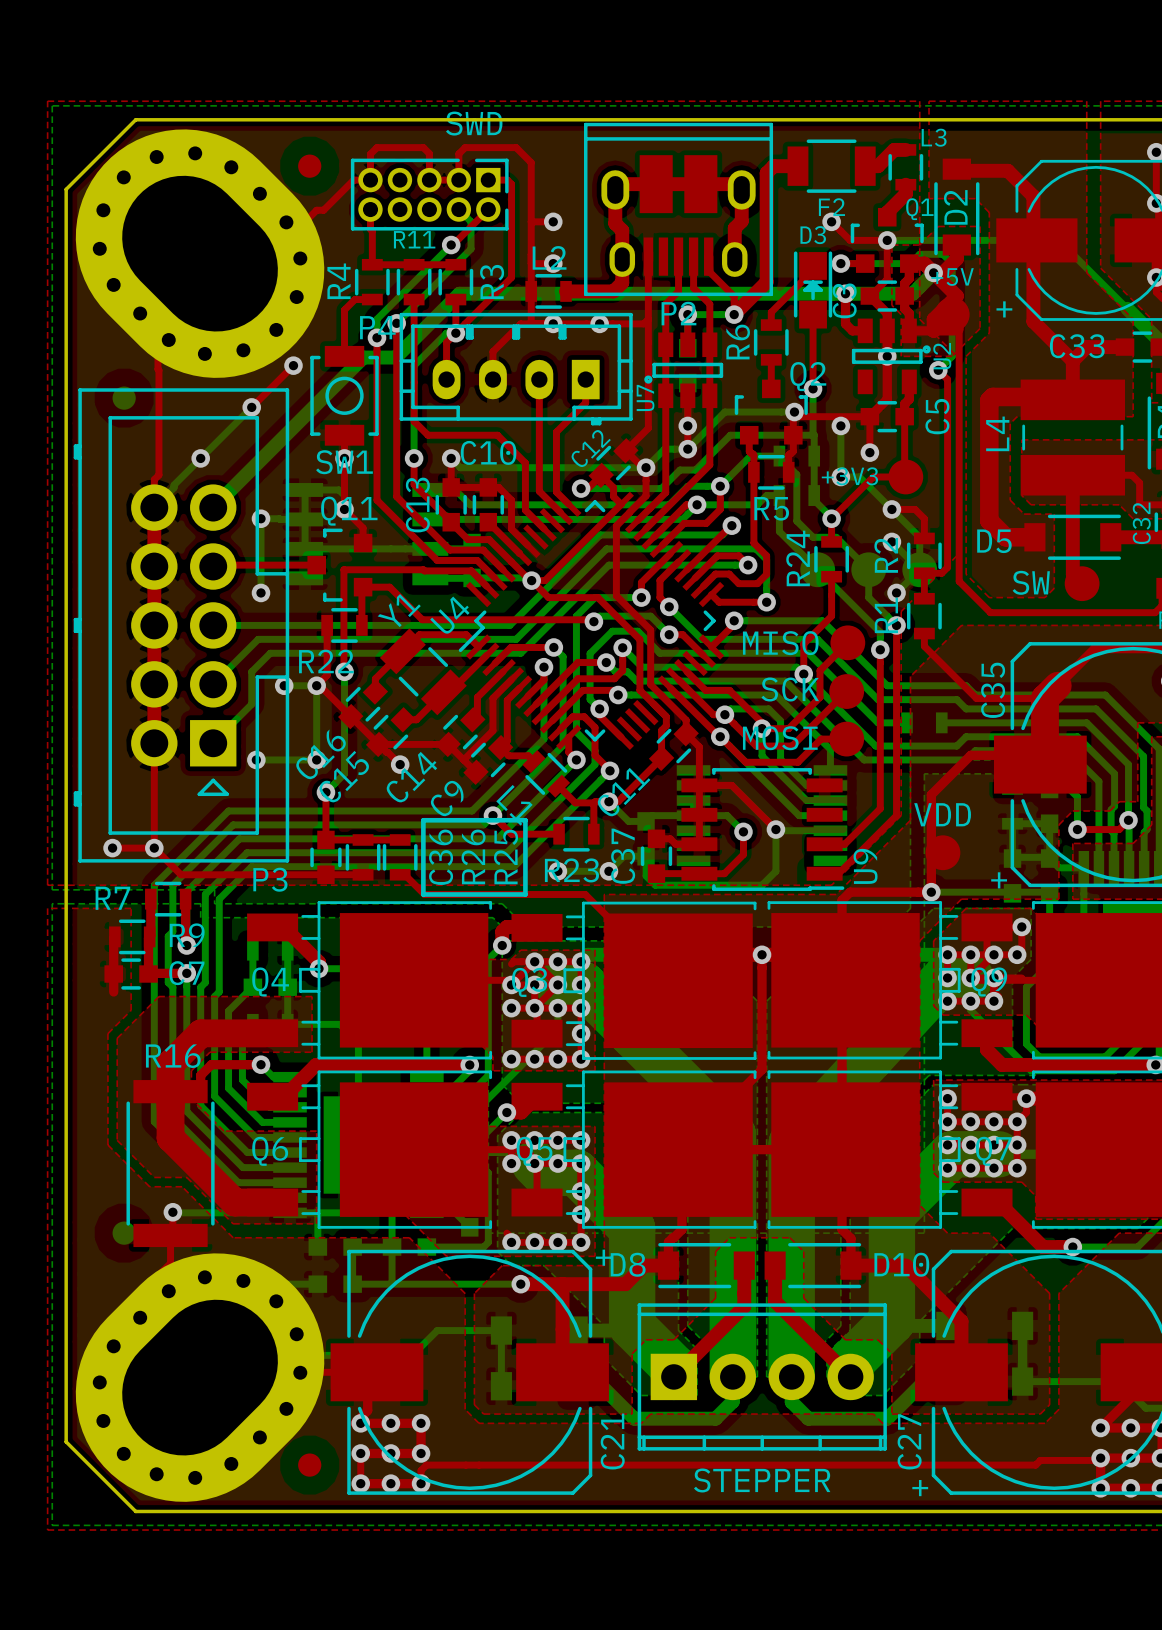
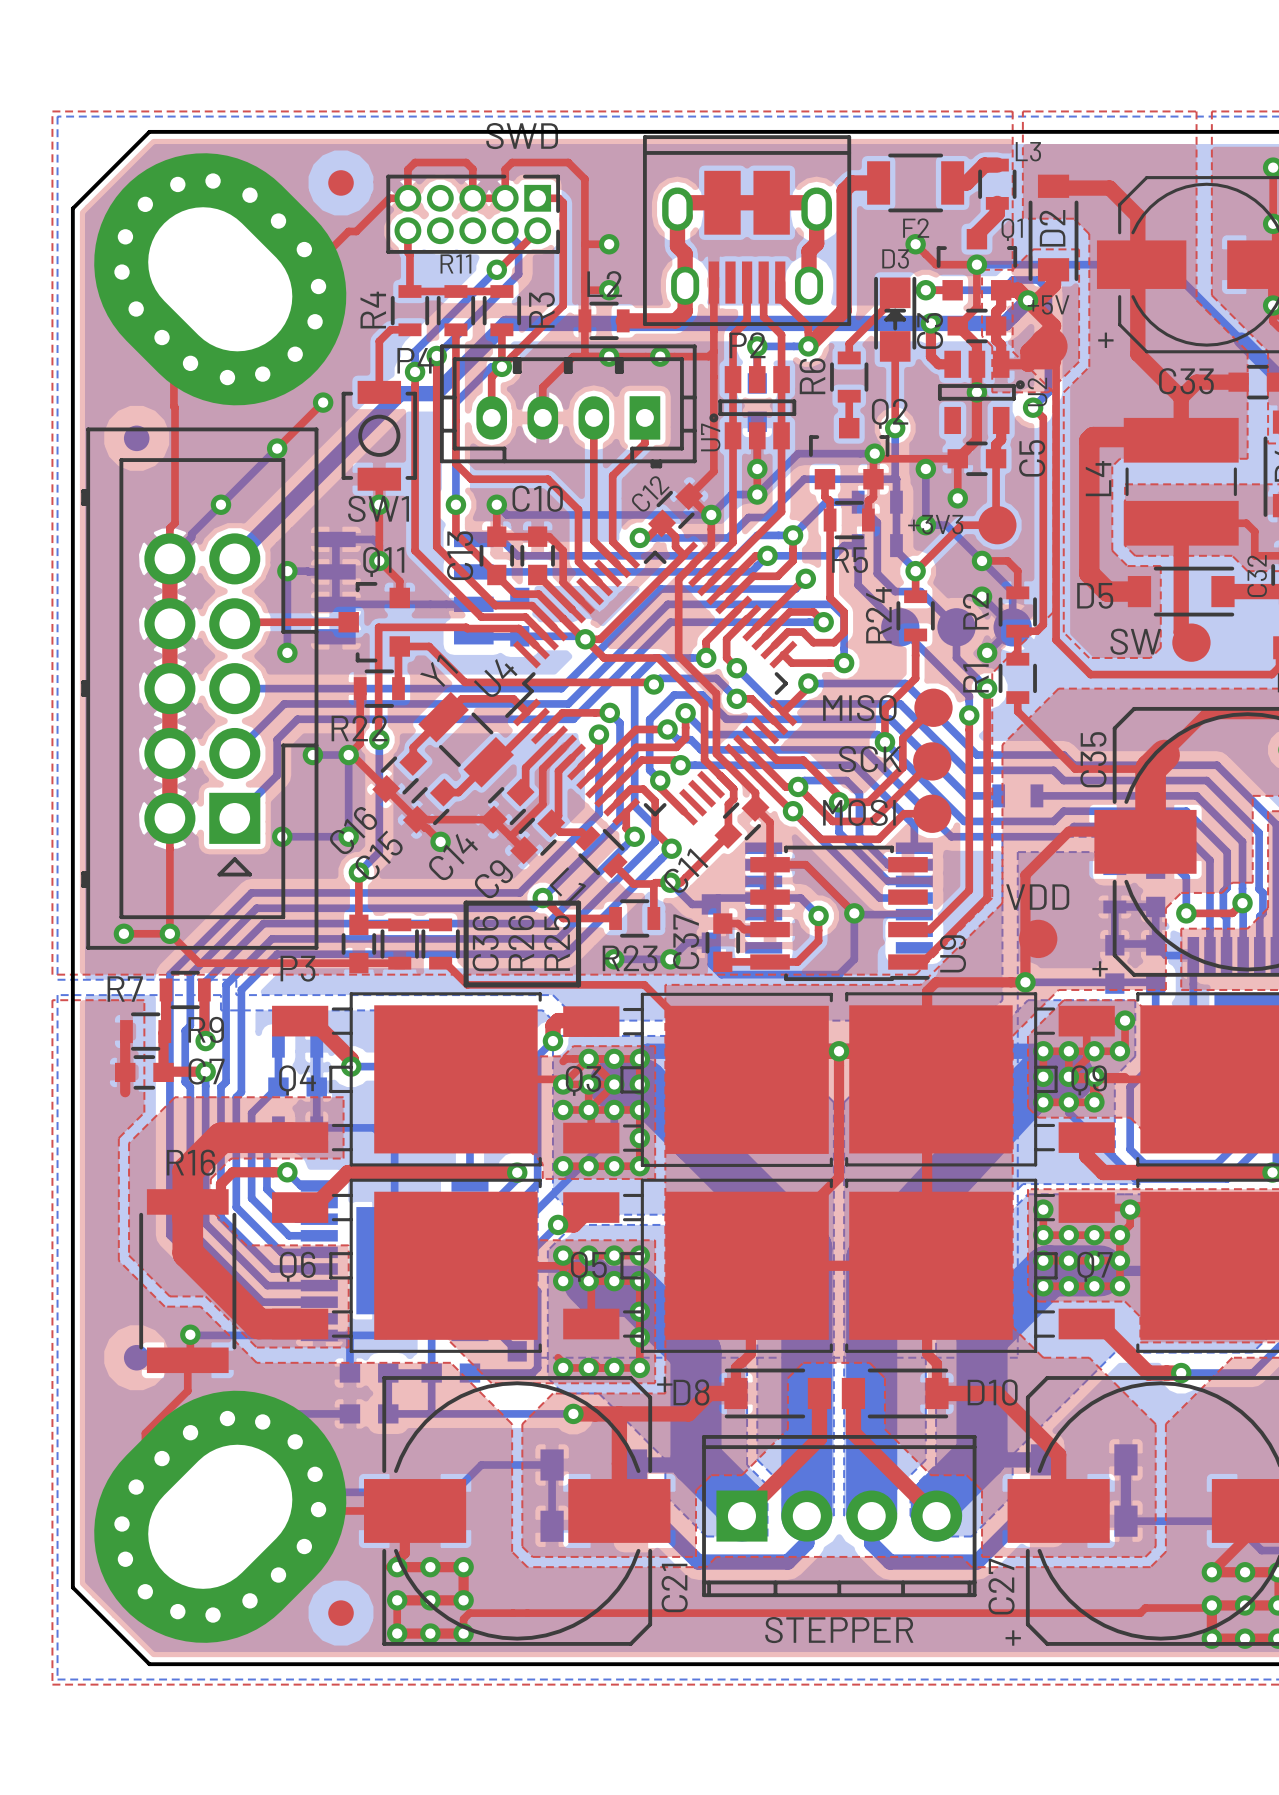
part footprint: [75, 129, 325, 378] -> [94, 153, 347, 406]
part footprint: [75, 1253, 325, 1502] -> [94, 1390, 347, 1643]

